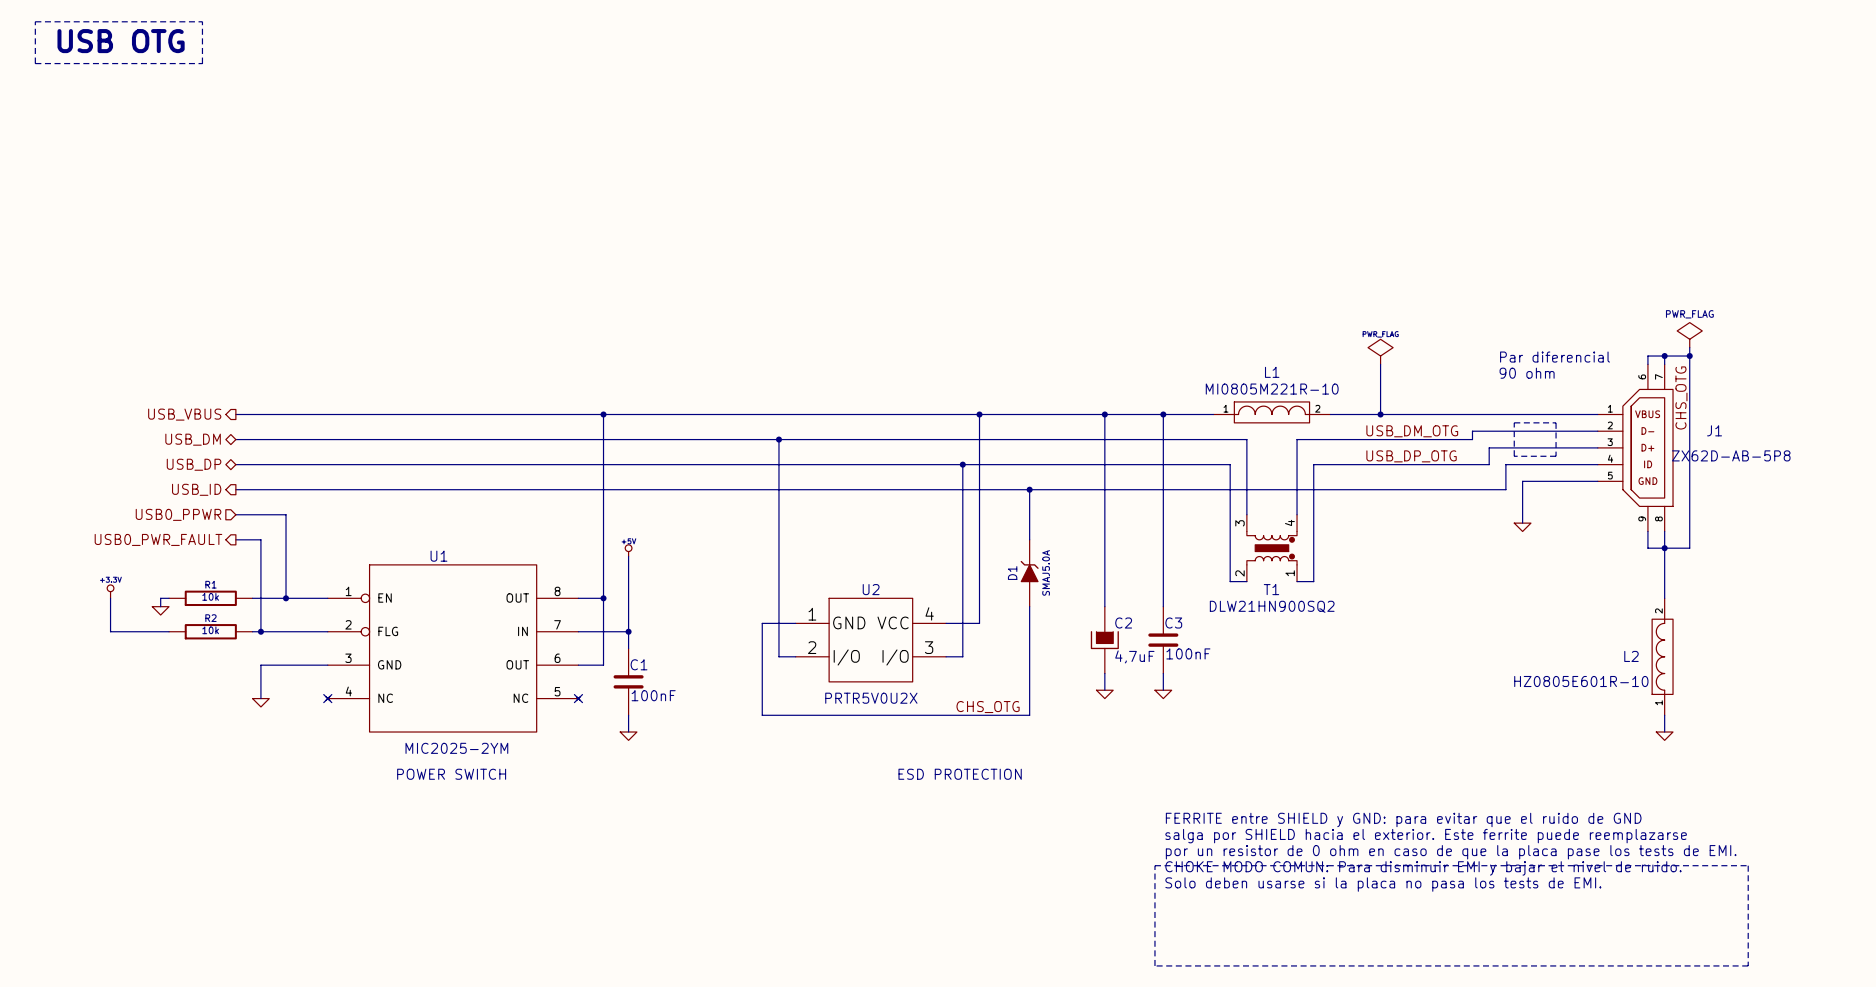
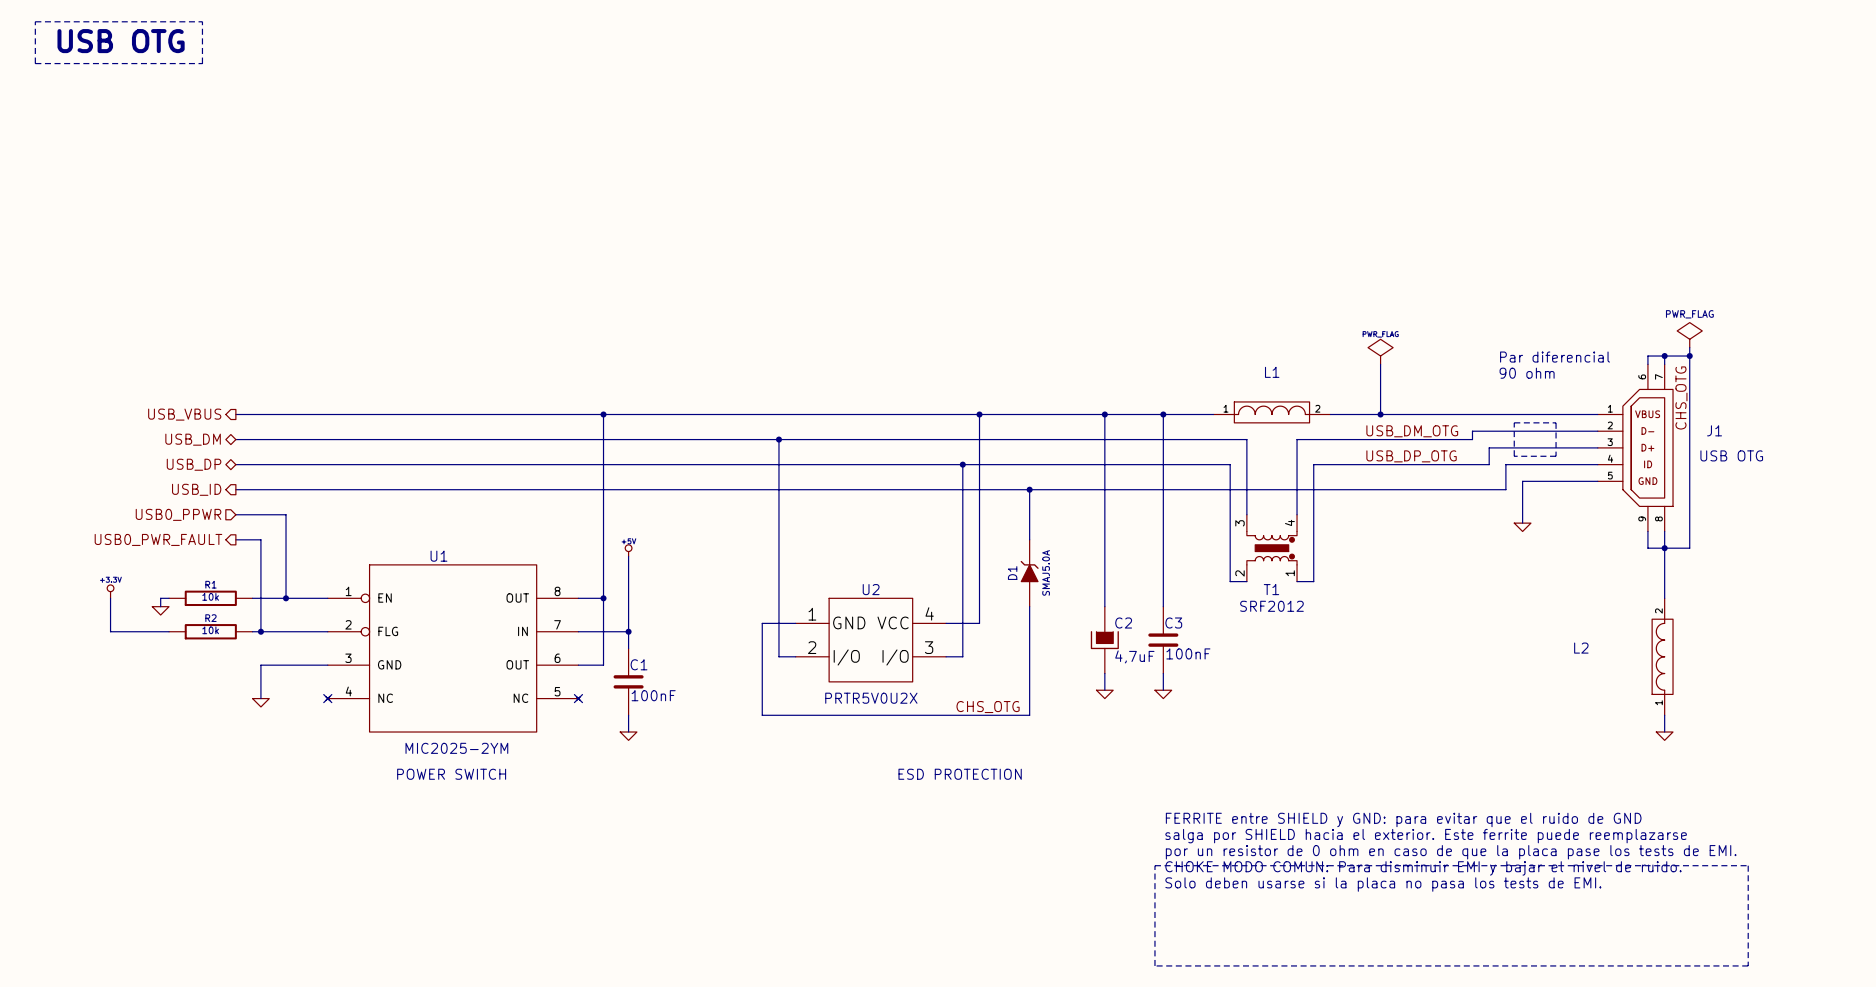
L1 value: MI0805M221R-10 (1272, 389) -> none
J1 value: ZX62D-AB-5P8 (1731, 455) -> USB OTG (1731, 455)
T1 value: DLW21HN900SQ2 (1272, 606) -> SRF2012 (1271, 606)
L2 name position: L2 (1631, 656) -> L2 (1581, 648)
L2 value: HZ0805E601R-10 (1581, 681) -> none

